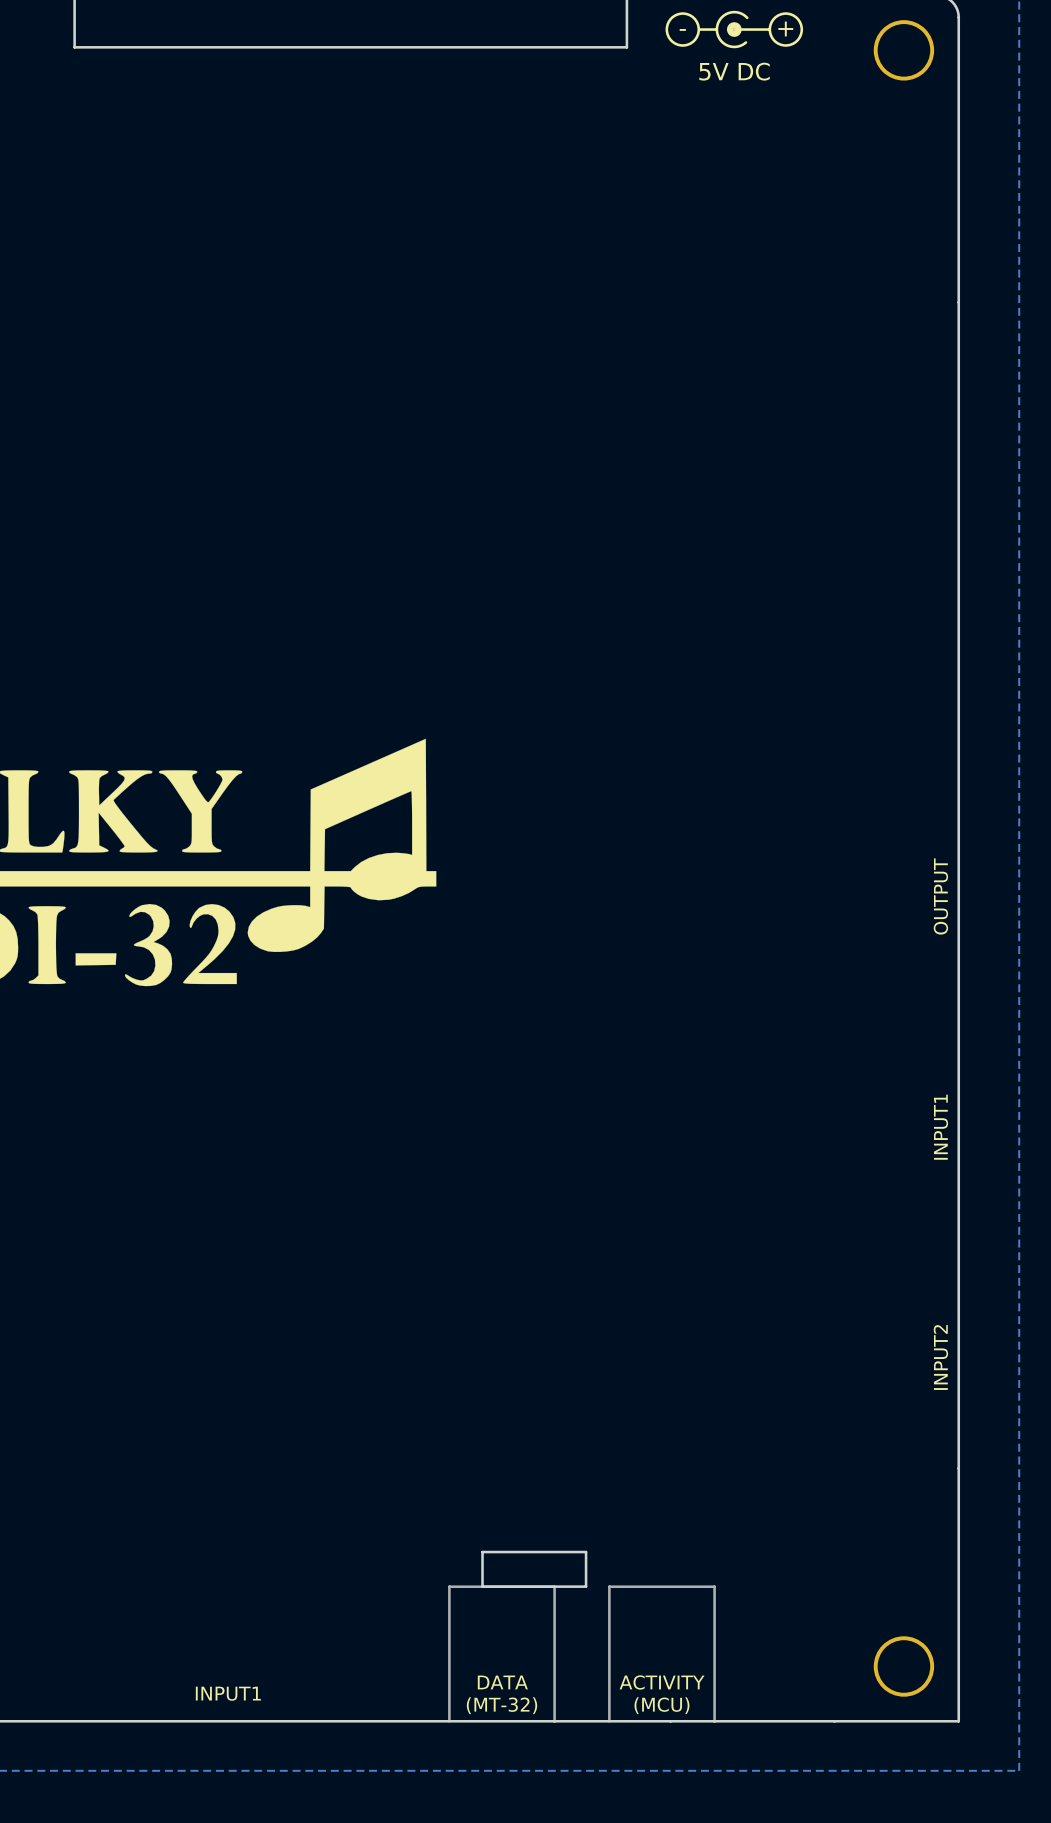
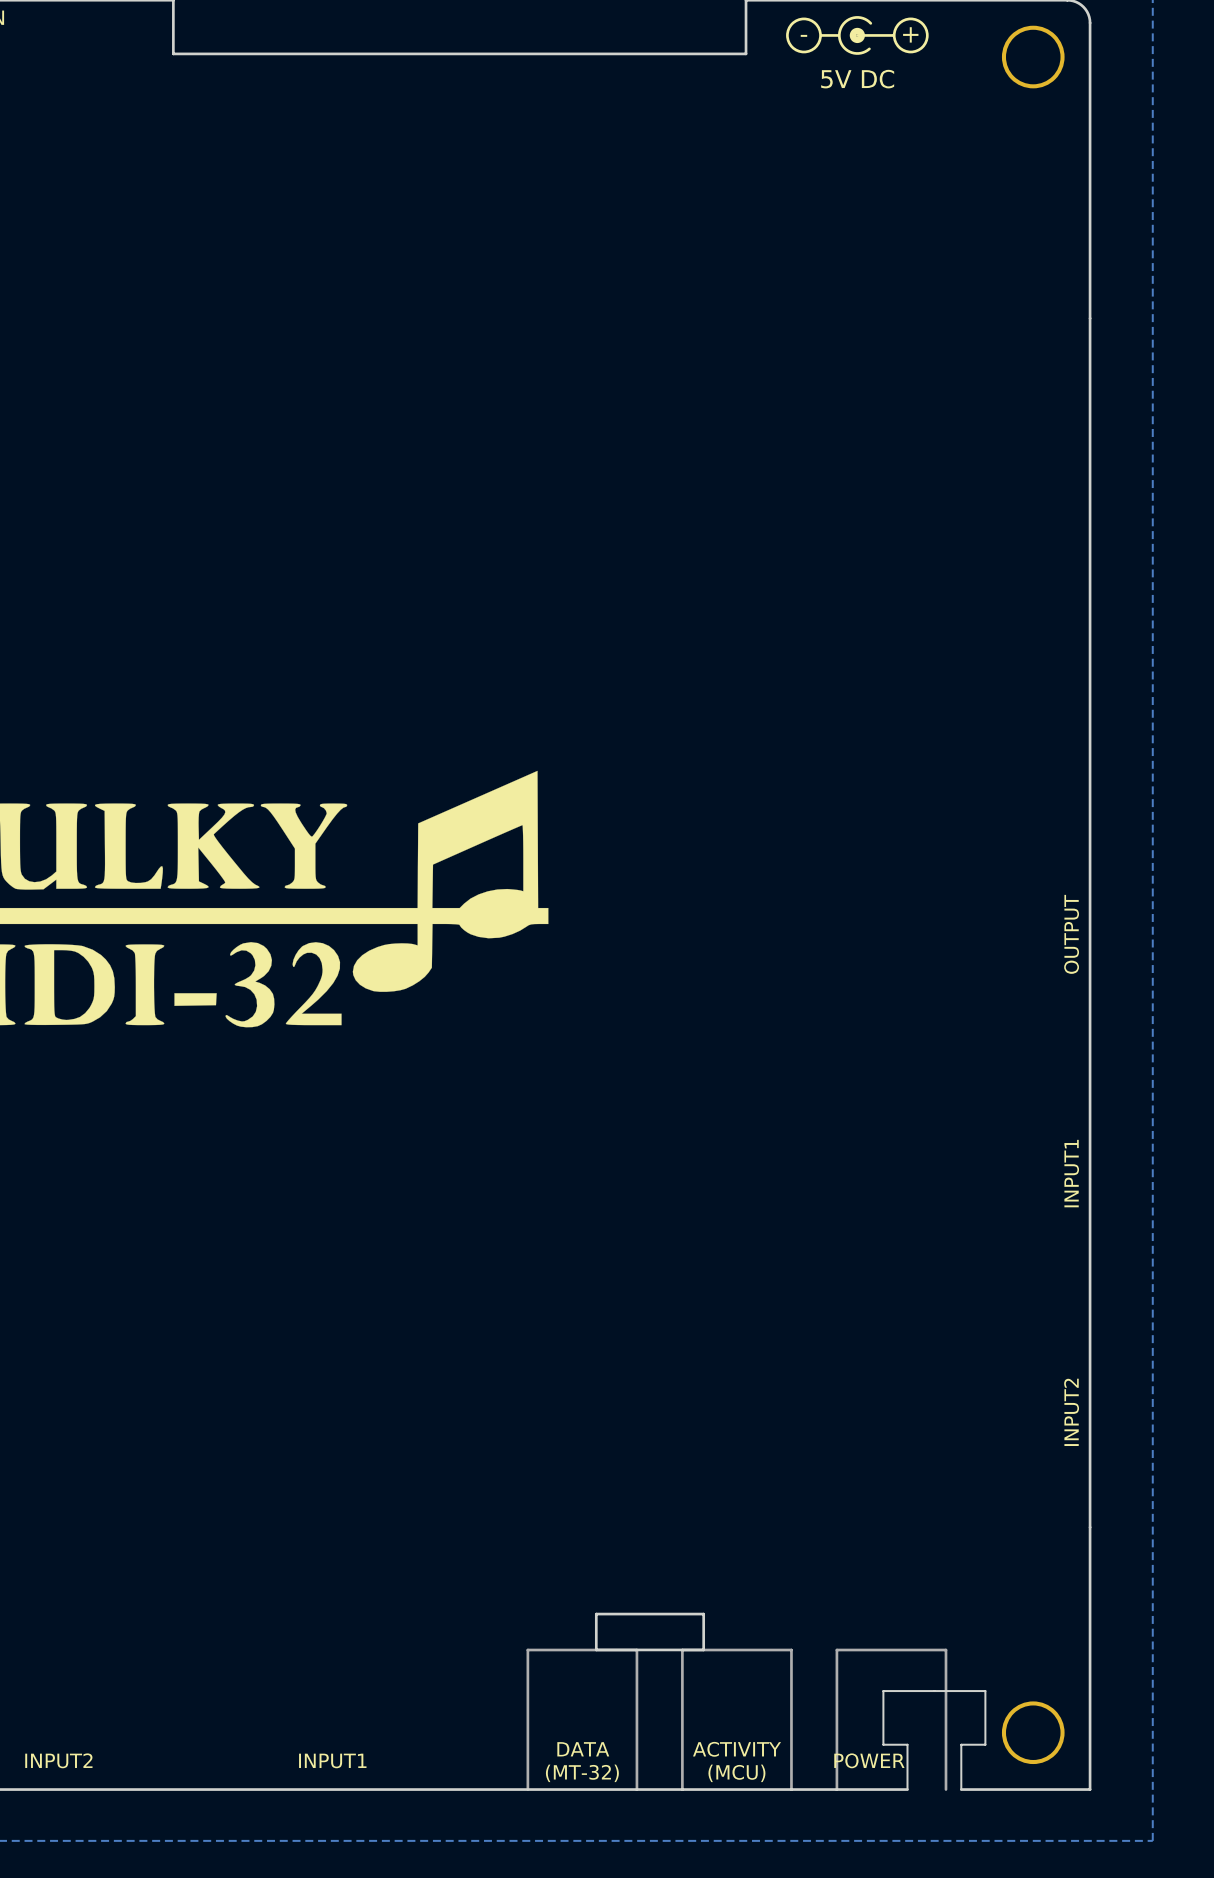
line: (449, 1586) (449, 1721) -> (561, 1650) (527, 1650) (527, 1789)
line: (521, 1586) (554, 1586) (554, 1721) -> (636, 1650) (636, 1789)
line: (609, 1586) (609, 1721) -> (727, 1650) (682, 1650) (682, 1789)
line: (714, 1586) (670, 1586) -> (791, 1789) (791, 1650)
line: none -> (836, 1650) (945, 1650) (945, 1789)
text position: DATA (502, 1682) -> DATA (583, 1749)
text position: ACTIVITY (662, 1682) -> ACTIVITY (737, 1749)
text: none -> POWER (869, 1760)
text position: (MT-32) (501, 1705) -> (MT-32) (582, 1773)
text position: (MCU) (661, 1705) -> (MCU) (736, 1773)
board edge: (834, 1721) (782, 1721) -> (961, 1789) (961, 1744) (985, 1744) (985, 1691) (883, 1691) (883, 1744) (907, 1744) (907, 1789)

